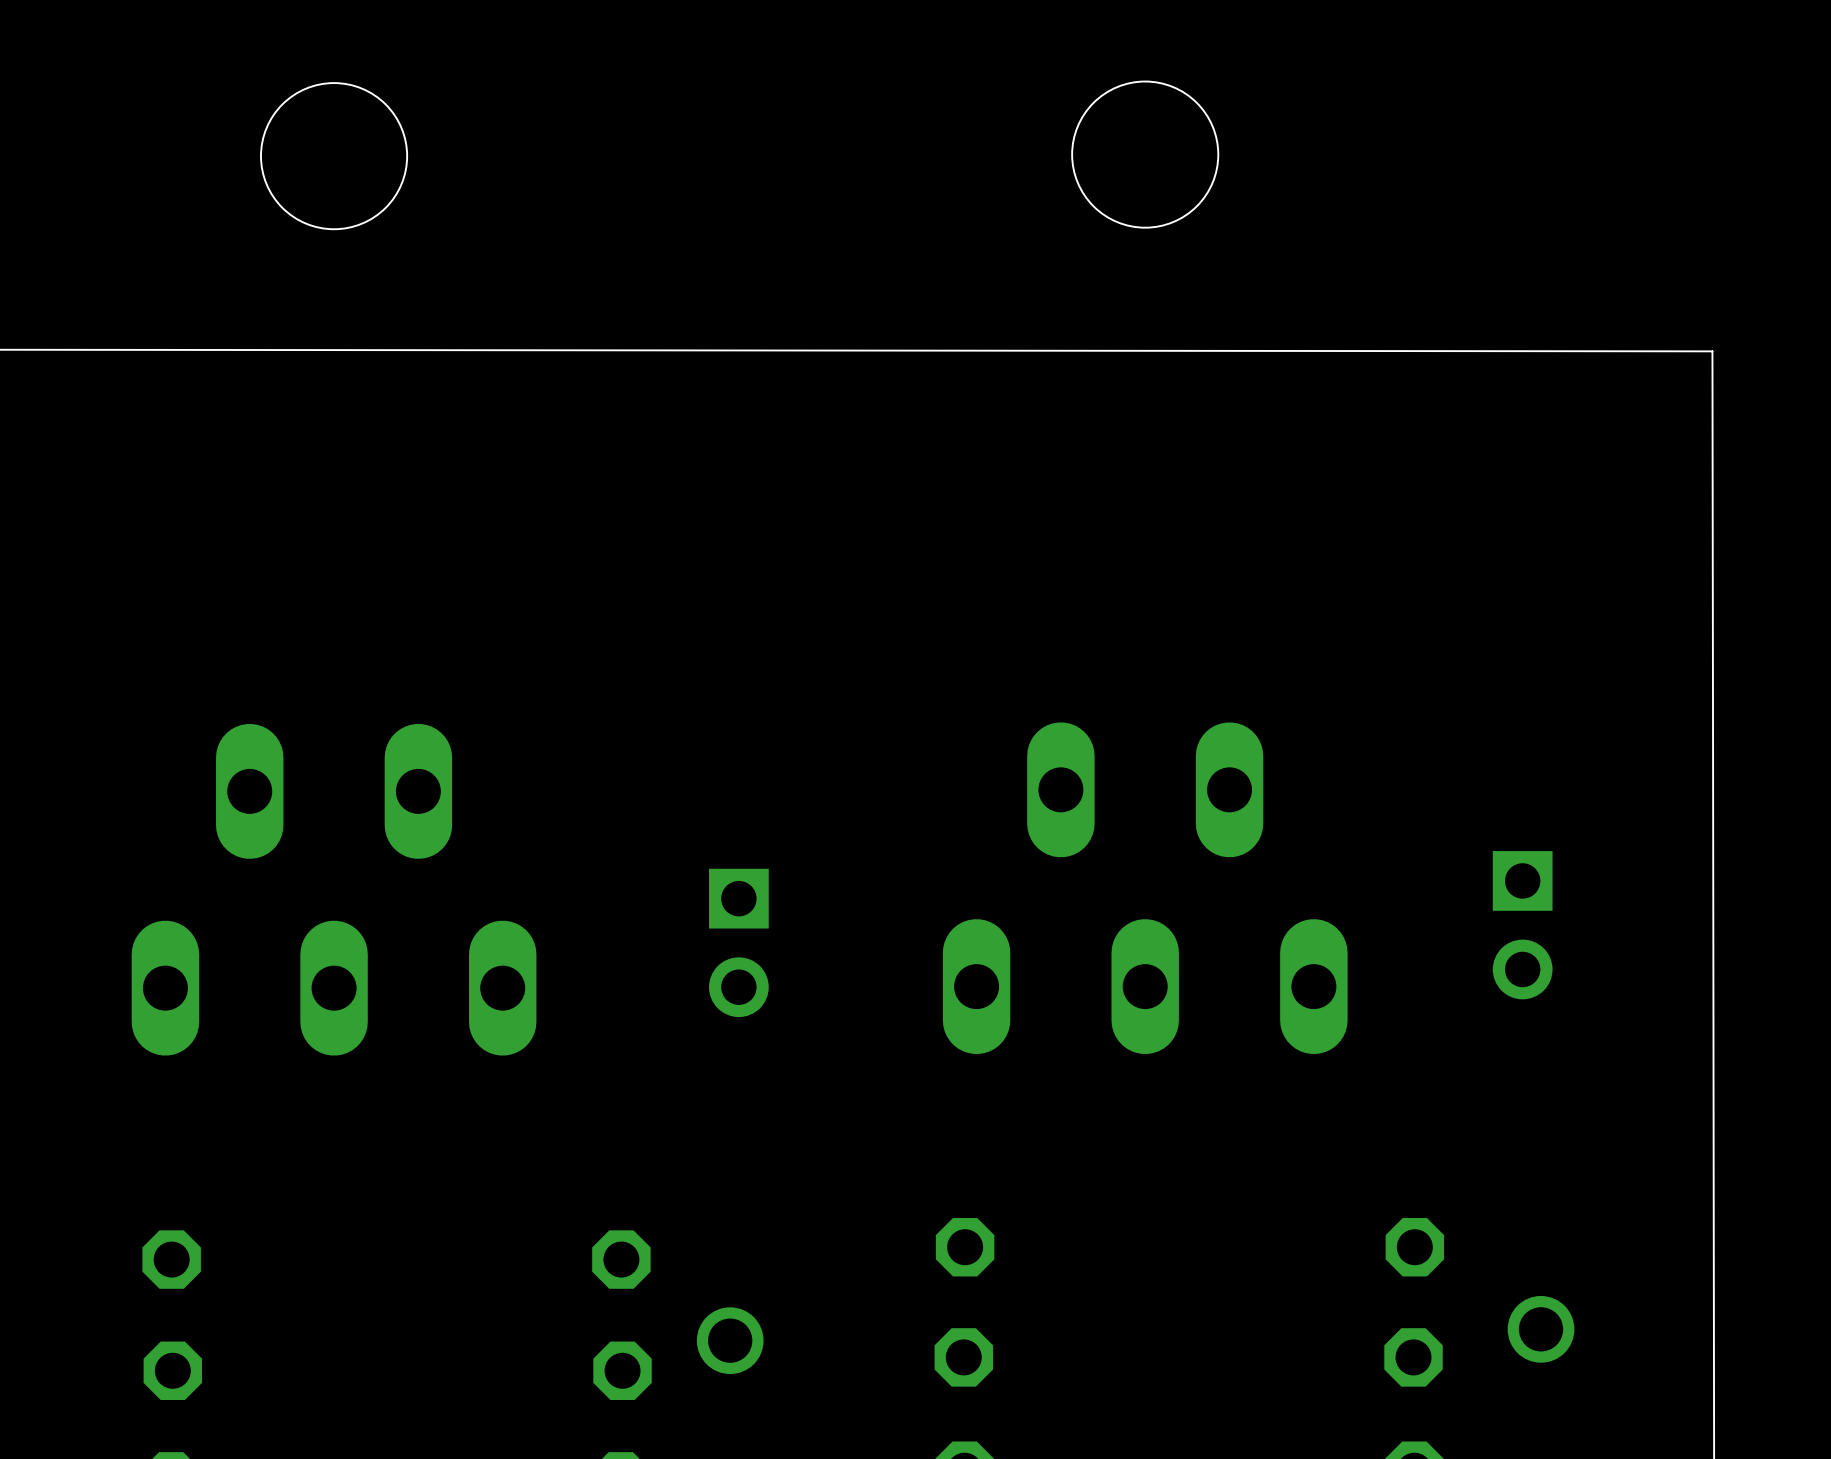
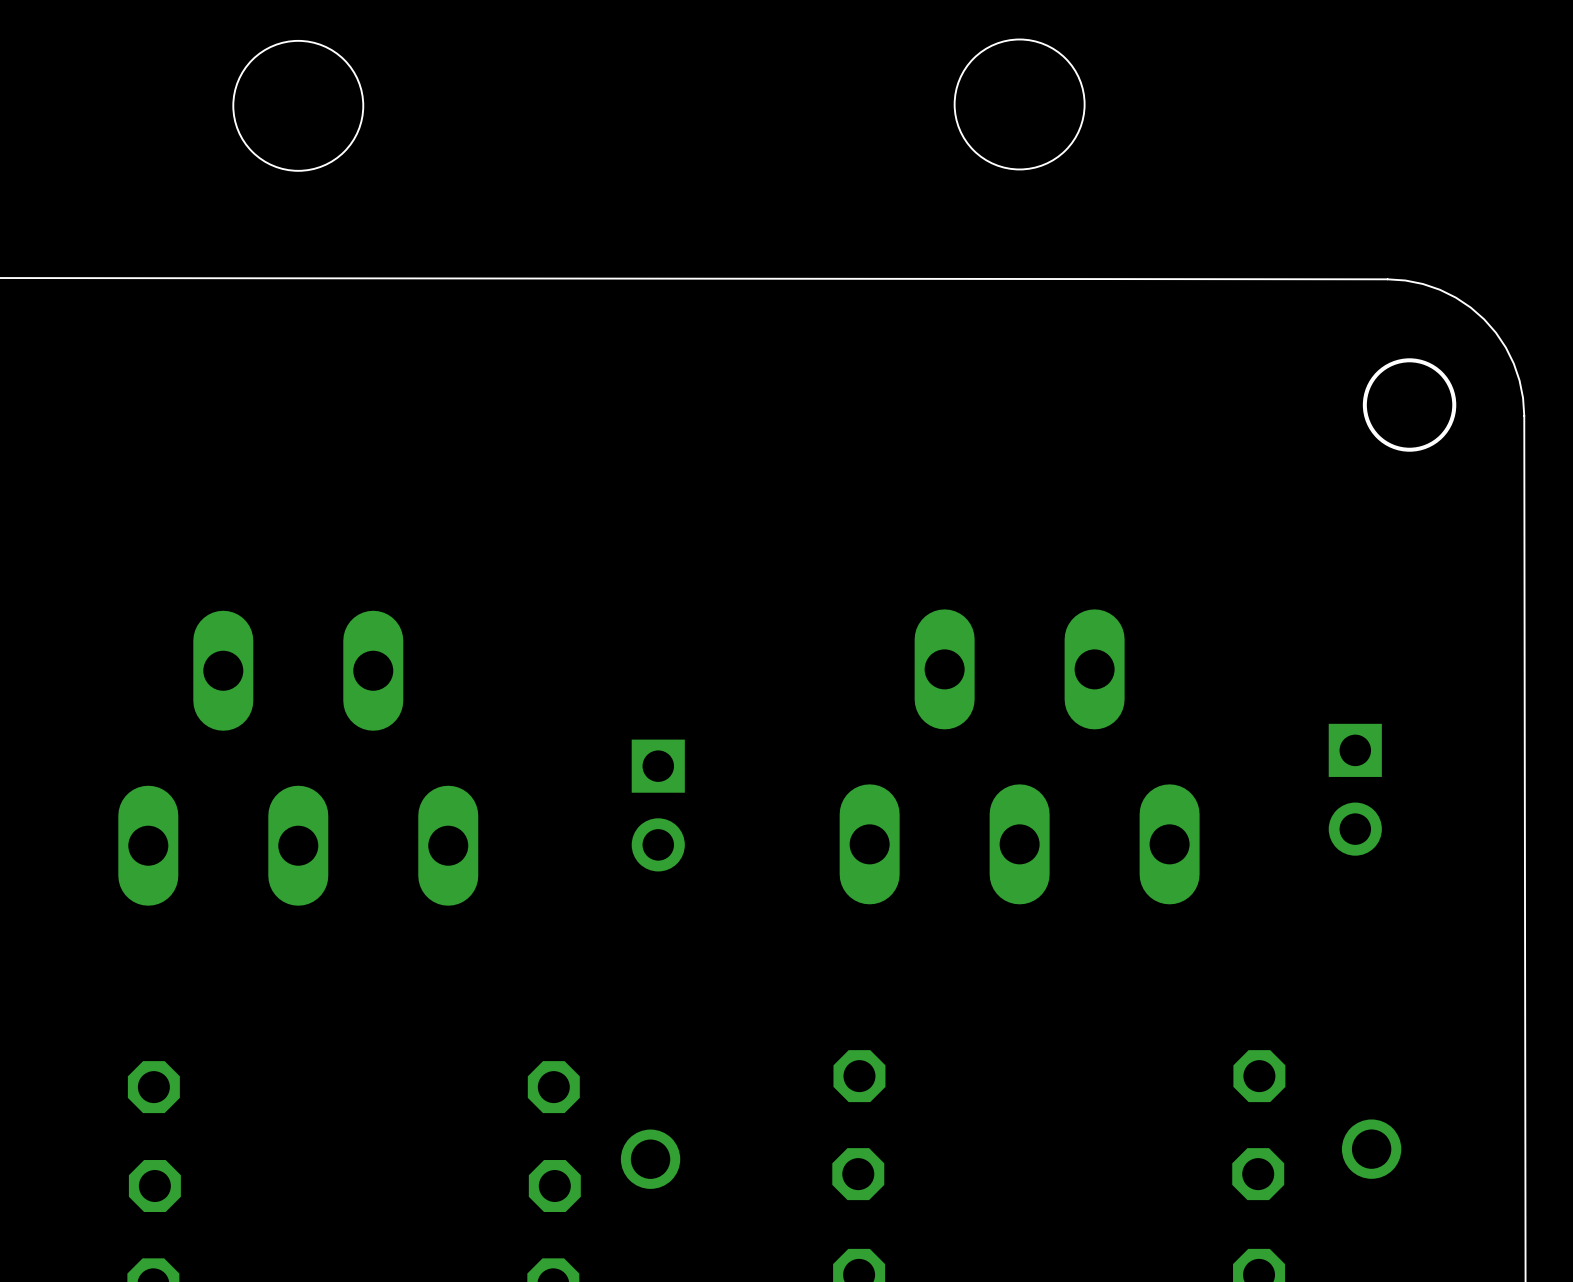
board edge: (1559, 351) (1712, 351) (1712, 504) -> (1387, 279) (1405, 280) (1439, 289) (1455, 297) (1484, 319) (1505, 347) (1513, 363) (1519, 380) (1524, 415)
round board edge: none -> [1362, 358, 1457, 452]

